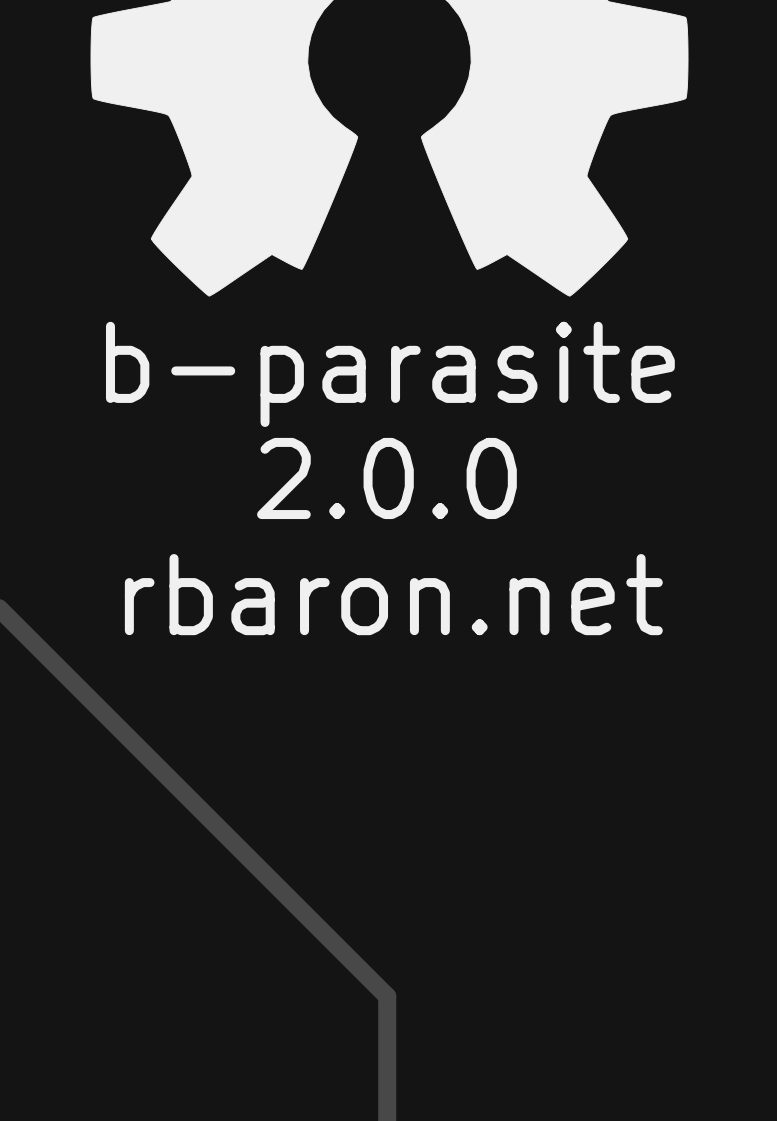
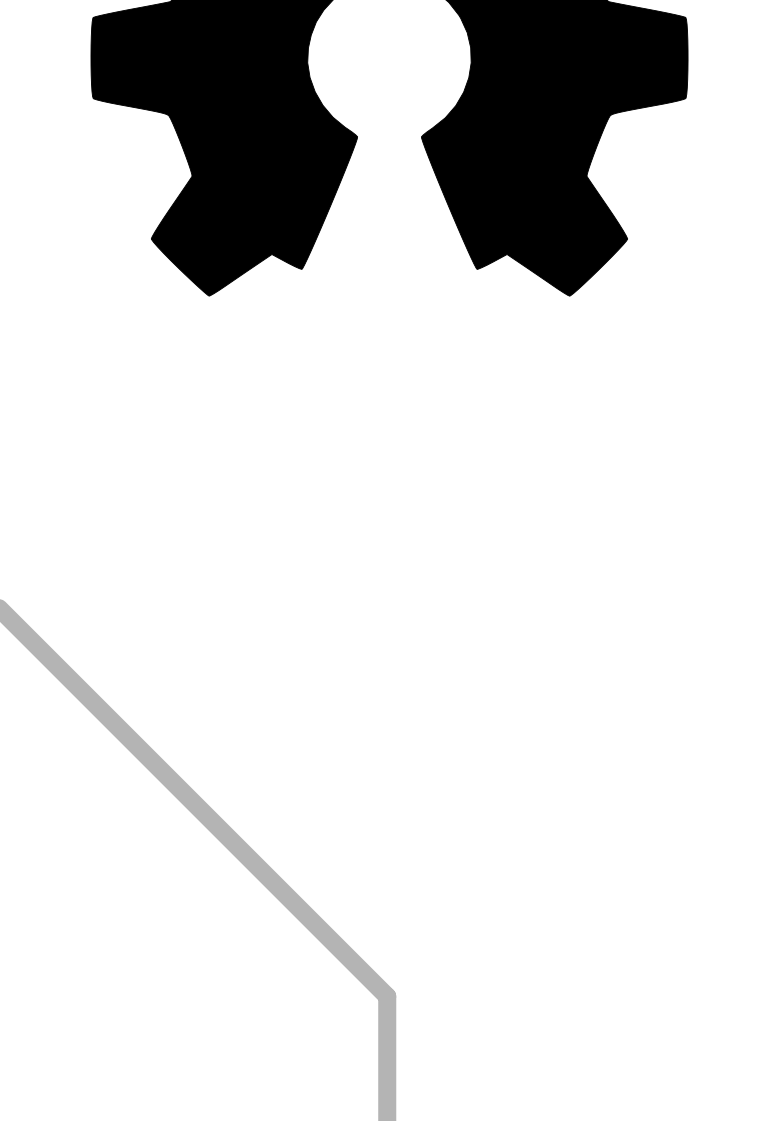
text: b-parasite (390, 374) -> none
text: 2.0.0 (386, 478) -> none
text: rbaron.net (393, 594) -> none

